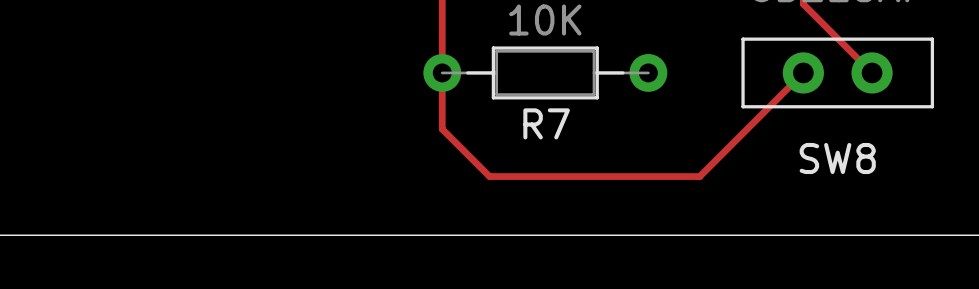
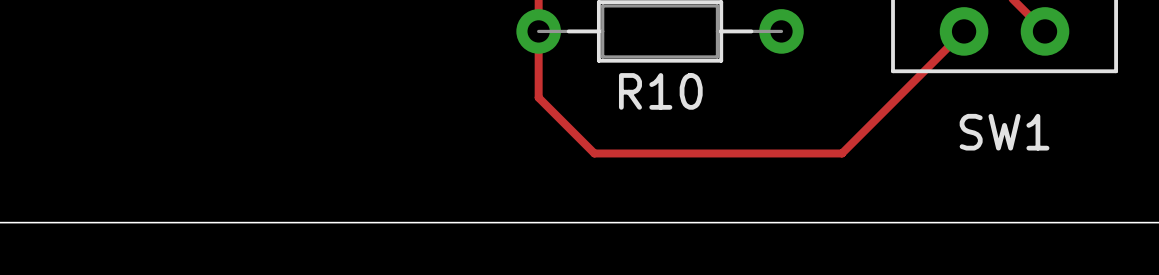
R7 name: R7 (546, 123) -> R10 (660, 91)
SW8 name: SW8 (837, 158) -> SW1 (1004, 132)

